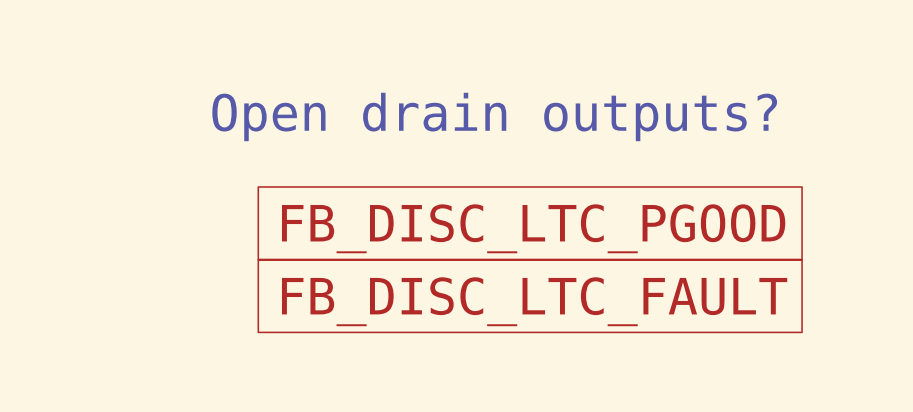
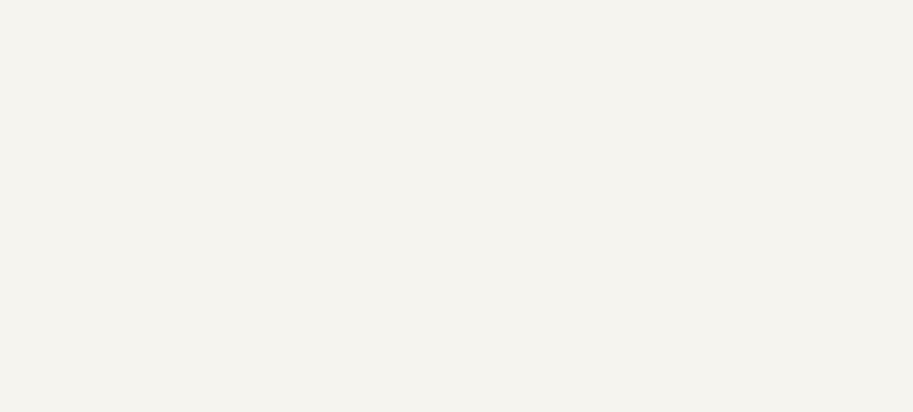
text: Open drain outputs? (494, 116) -> none
global label: FB_DISC_LTC_PGOOD (533, 228) -> none
global label: FB_DISC_LTC_FAULT (534, 301) -> none

